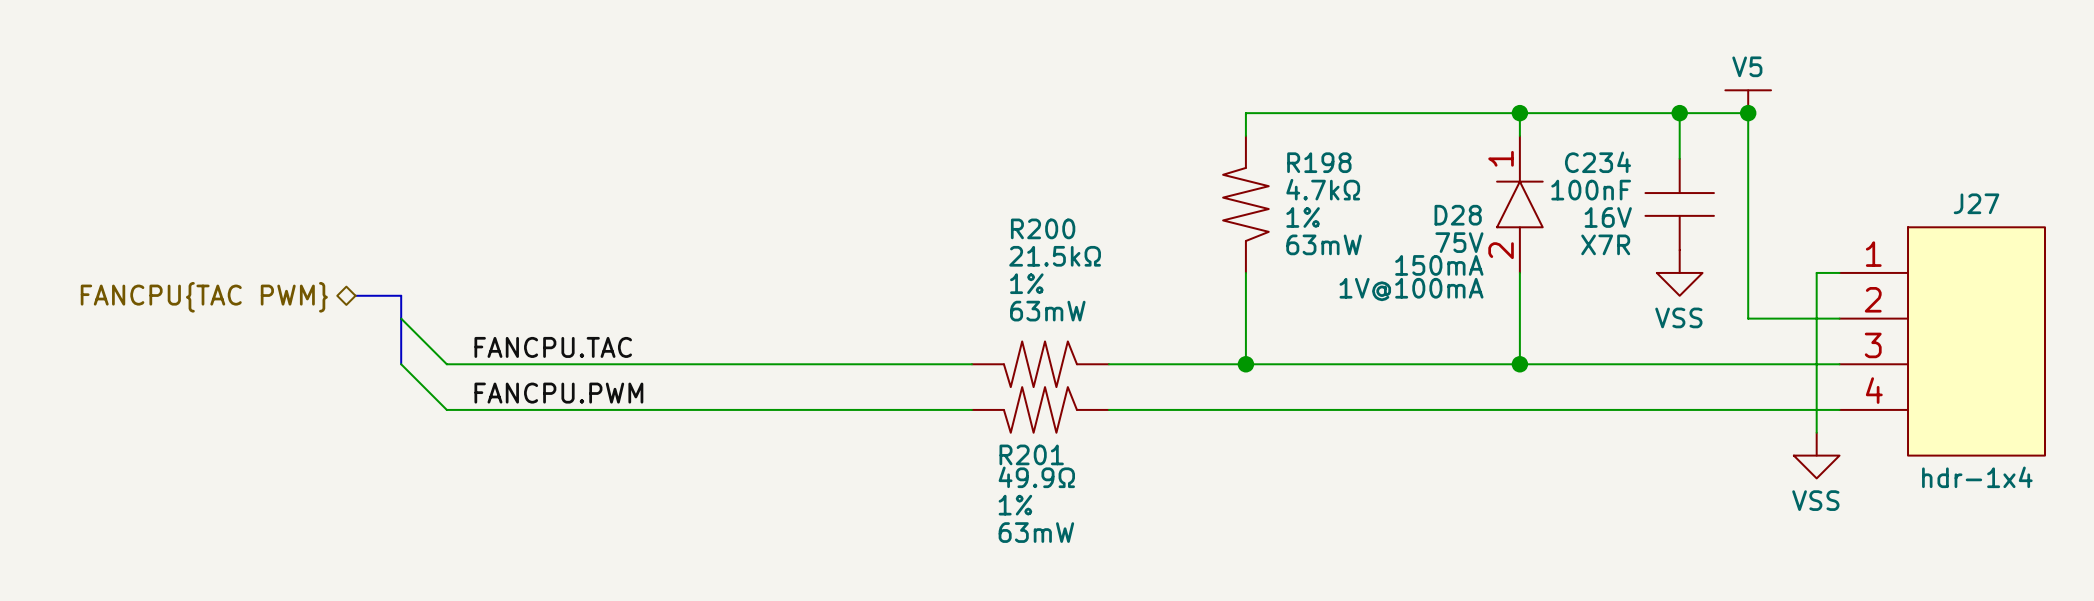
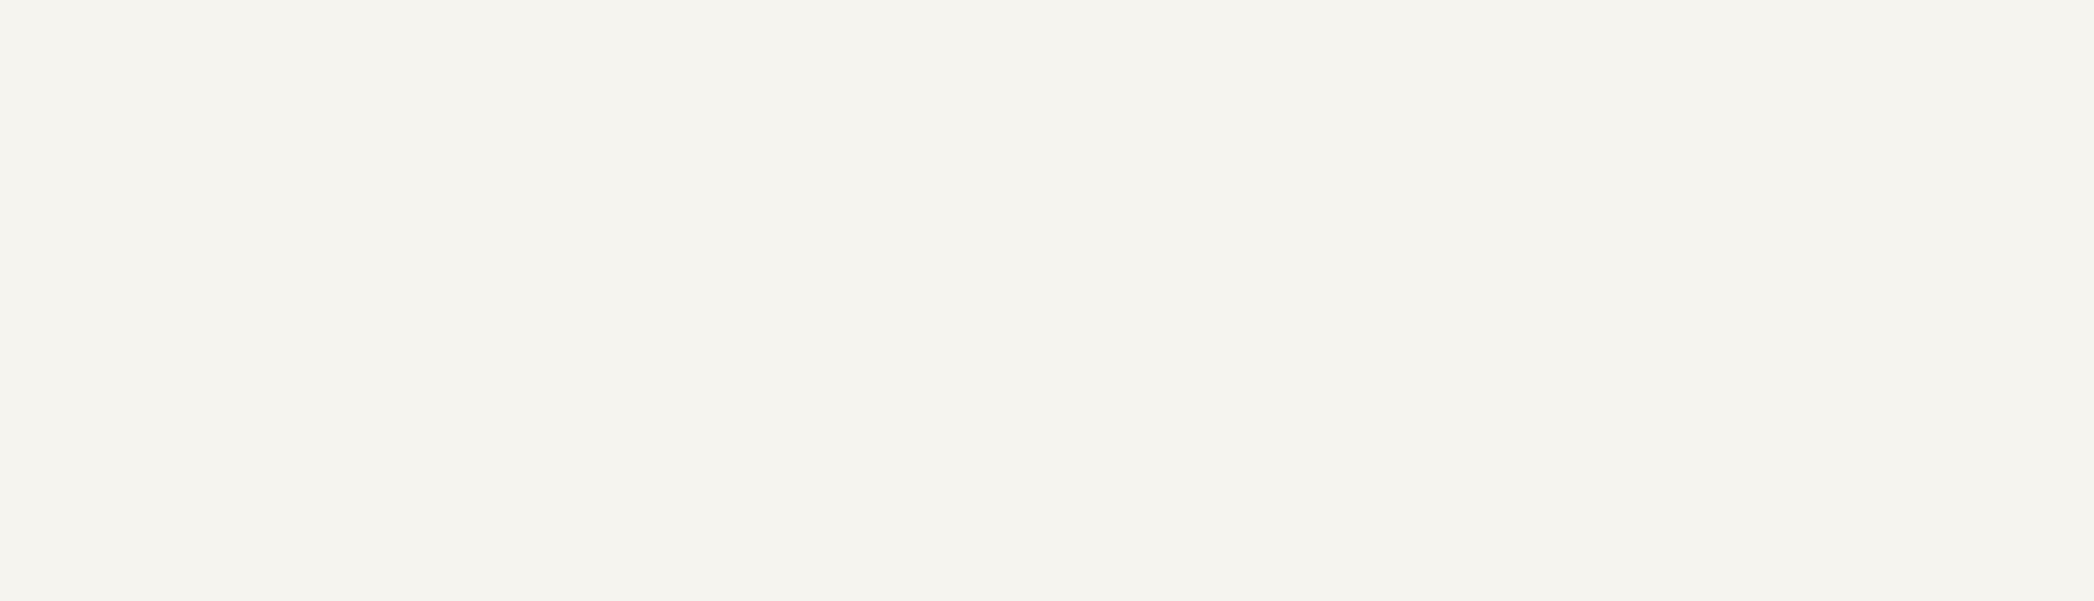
power symbol: V5 (1748, 101) -> none
wire: (1519, 113) (1519, 135) -> none
junction: (1519, 113) -> none
wire: (1679, 113) (1679, 158) -> none
junction: (1679, 113) -> none
junction: (1748, 113) -> none
wire: (1245, 135) (1245, 113) (1748, 113) (1748, 318) (1839, 318) -> none
R198: (1245, 204) -> none
D28: (1519, 204) -> none
C234: (1679, 204) -> none
wire: (1245, 272) (1245, 364) -> none
wire: (1519, 272) (1519, 364) -> none
power symbol: VSS (1679, 272) -> none
wire: (1839, 272) (1816, 272) (1816, 432) -> none
bus: (355, 295) (401, 295) (401, 364) -> none
hierarchical label: FANCPU{TAC PWM} (204, 297) -> none
wire: (401, 318) (446, 364) (971, 364) -> none
J27: hdr-1x4 (1942, 341) -> none
label: FANCPU.TAC (553, 347) -> none
wire: (401, 364) (446, 409) (971, 409) -> none
R200: (1040, 364) -> none
wire: (1108, 364) (1839, 364) -> none
junction: (1245, 364) -> none
junction: (1519, 364) -> none
label: FANCPU.PWM (558, 393) -> none
R201: (1040, 409) -> none
wire: (1108, 409) (1839, 409) -> none
power symbol: VSS (1816, 455) -> none

